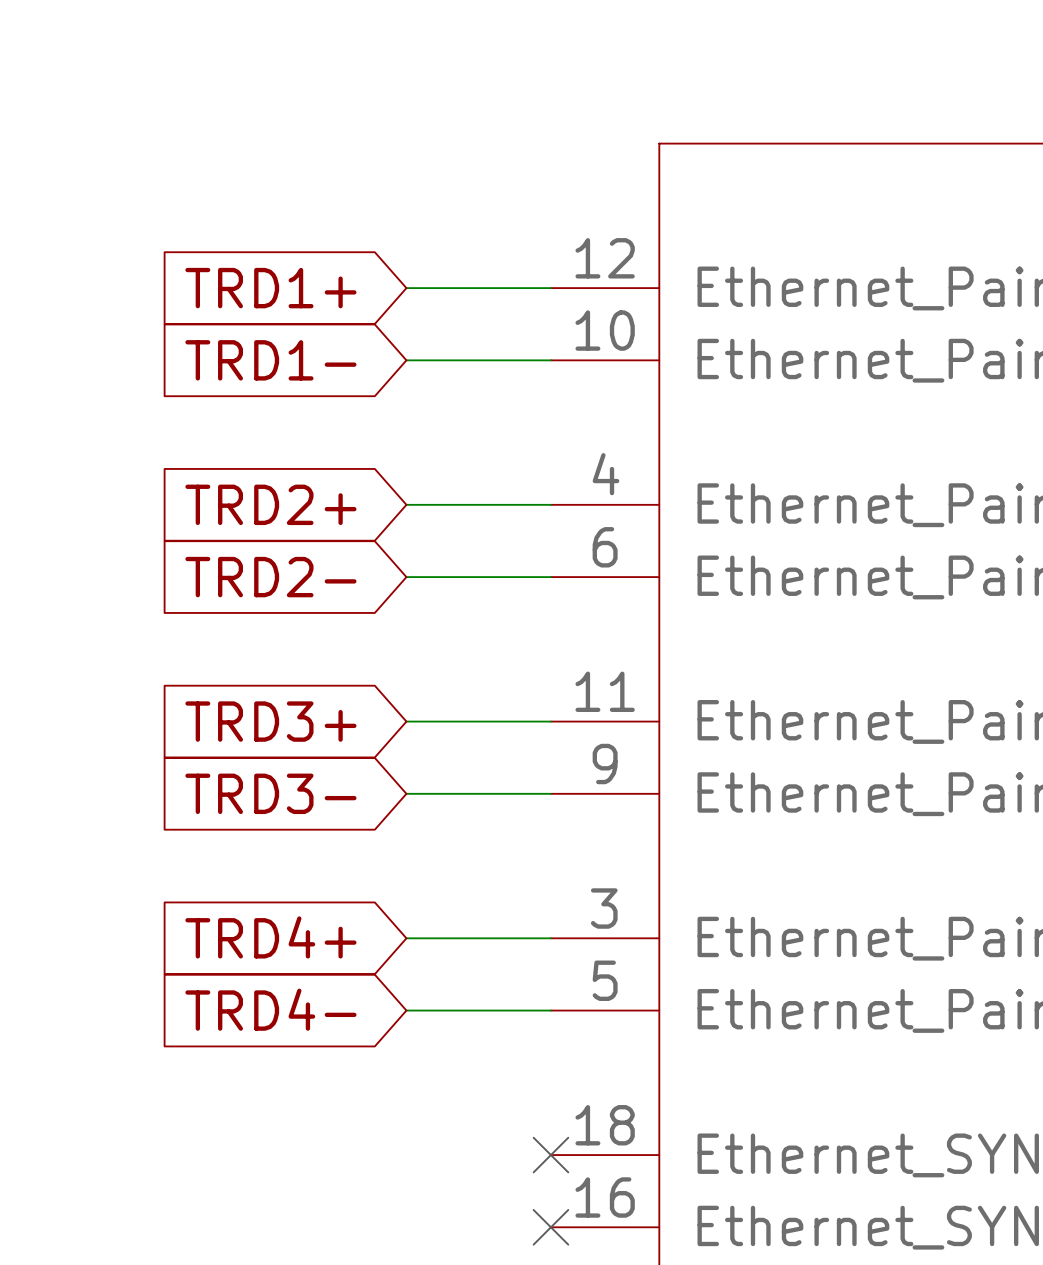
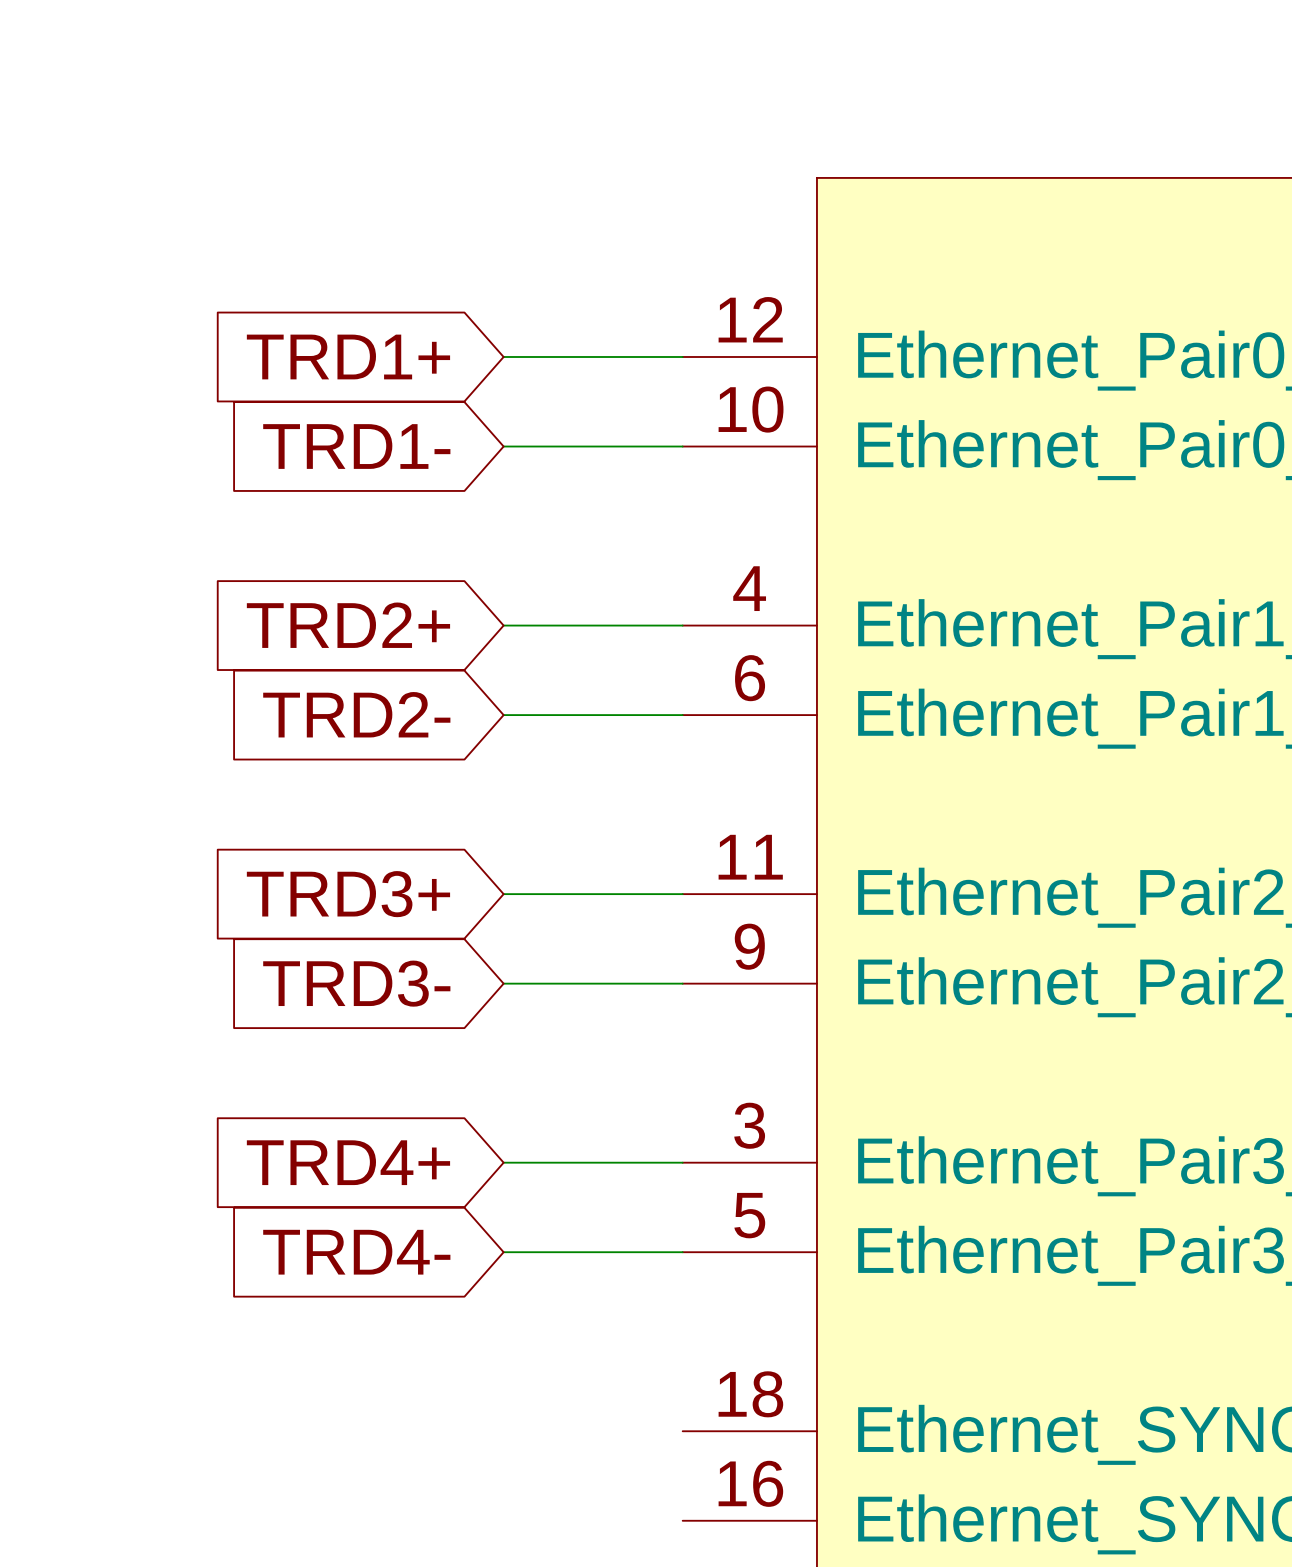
no-connect mark: (550, 1155) -> none
no-connect mark: (550, 1227) -> none

